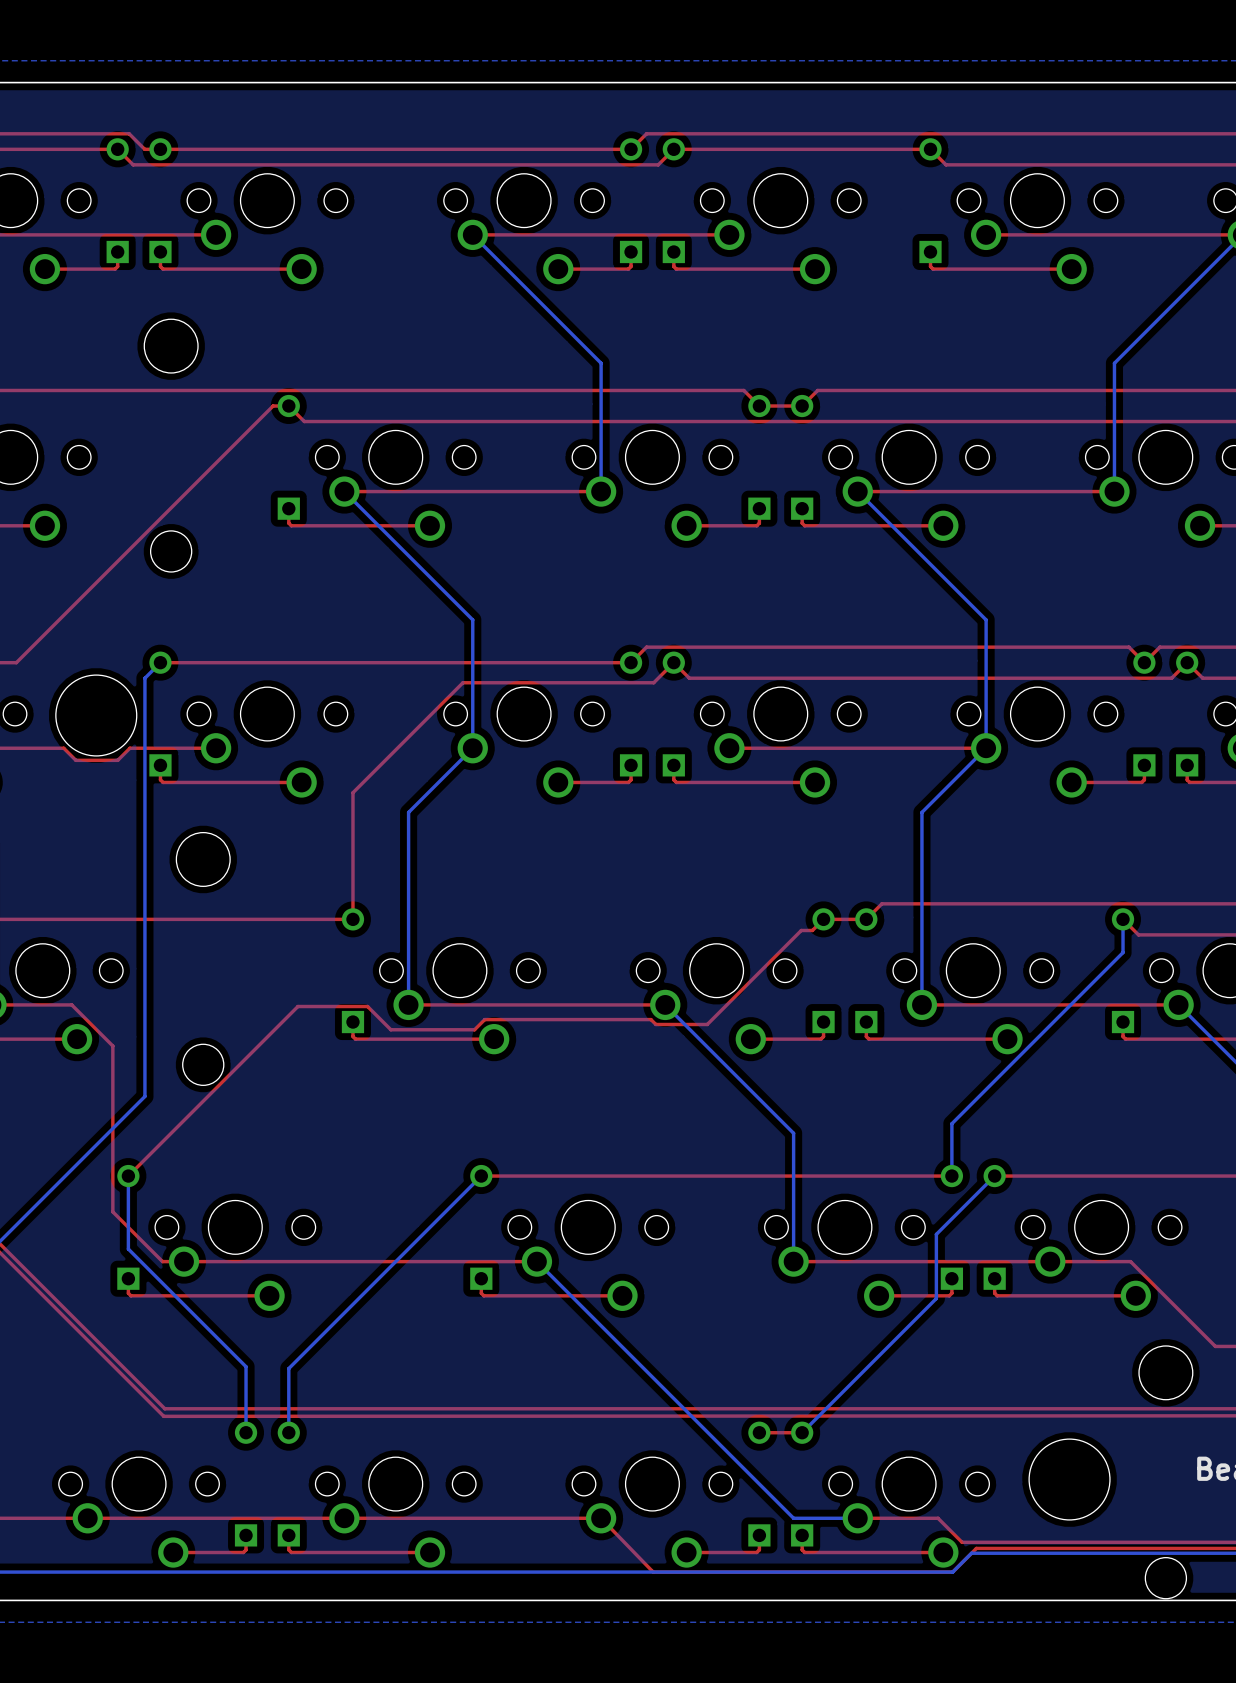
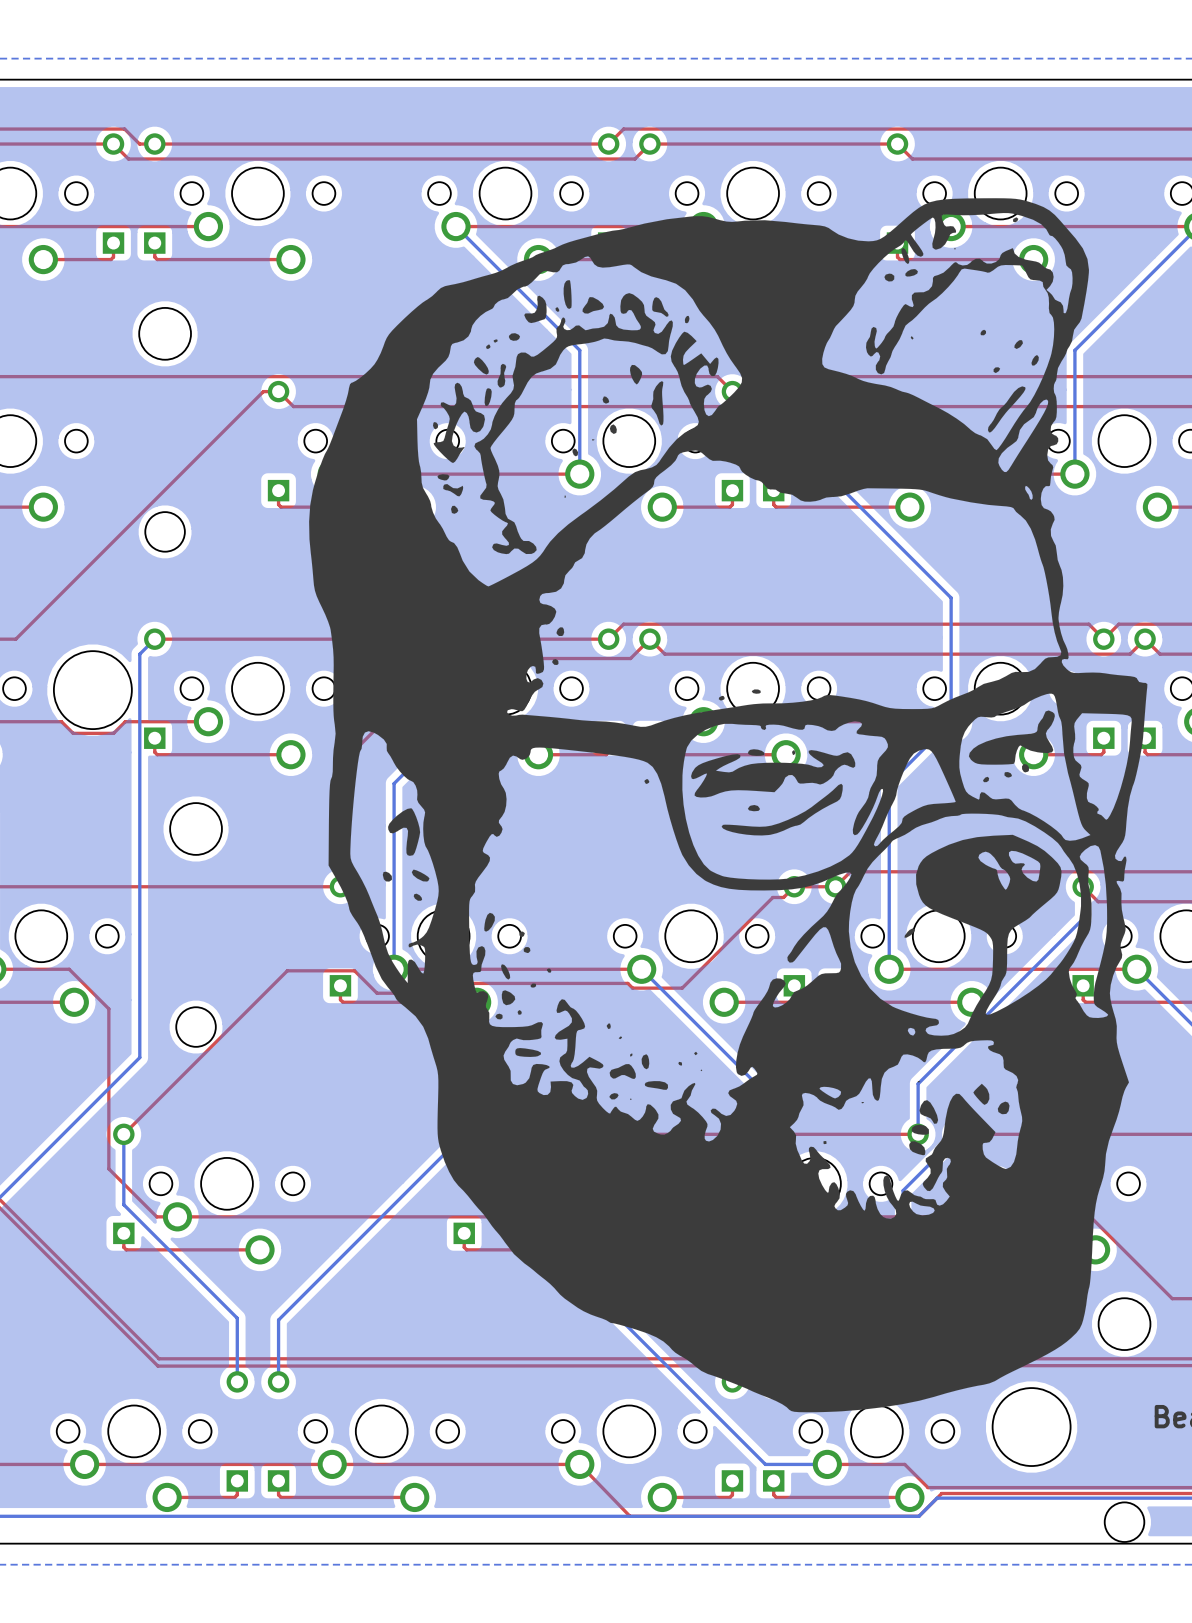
drawing: none -> [309, 198, 1148, 1413]

